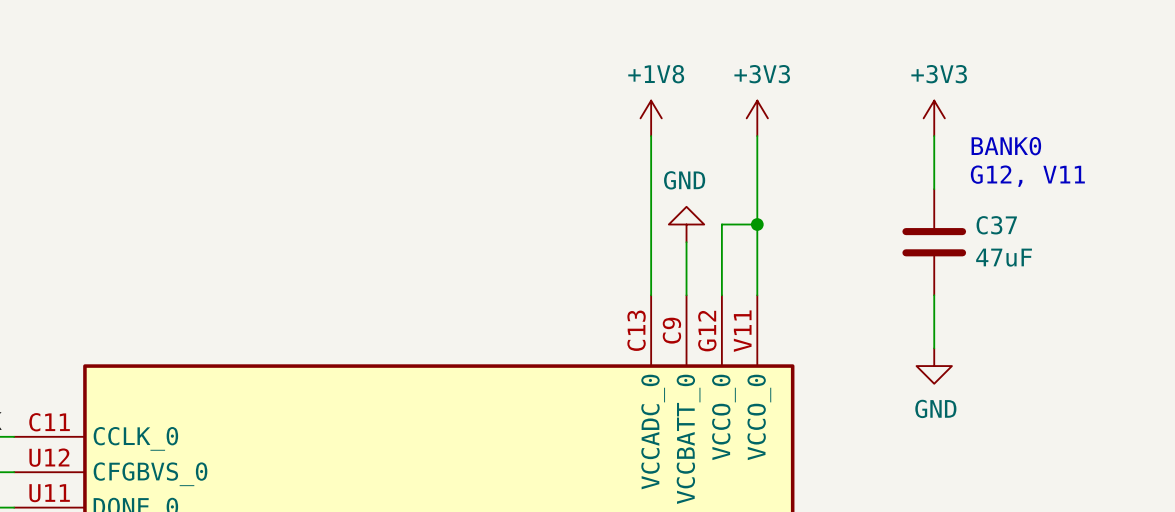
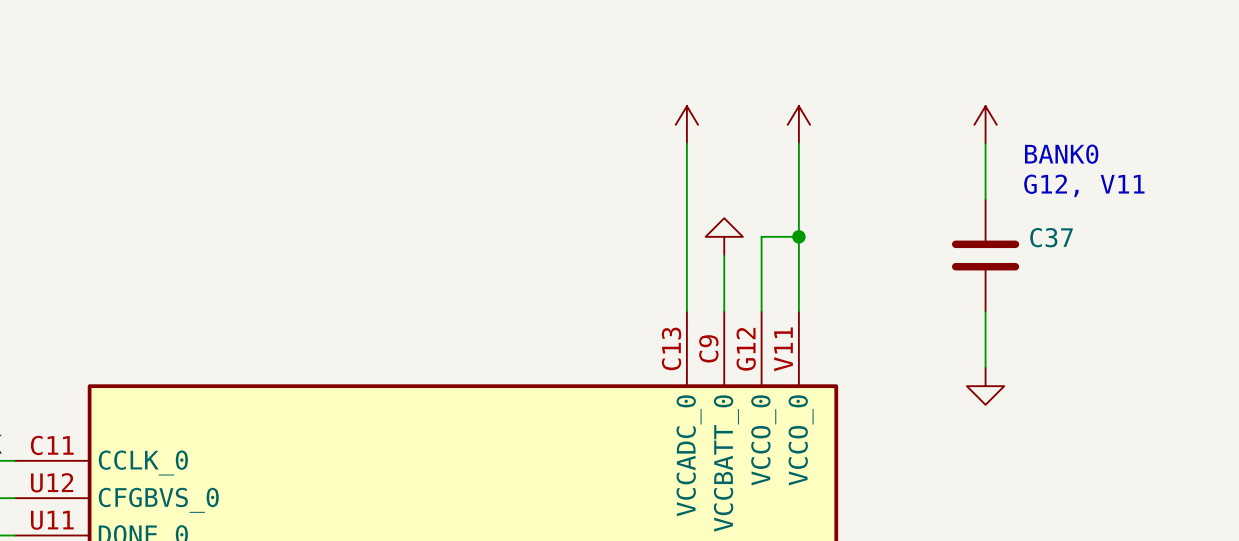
power symbol text: +1V8 (656, 74) -> none
power symbol text: +3V3 (762, 74) -> none
power symbol text: +3V3 (939, 74) -> none
power symbol text: GND (684, 180) -> none
C37 value: 47uF (1004, 257) -> none
power symbol text: GND (935, 408) -> none

